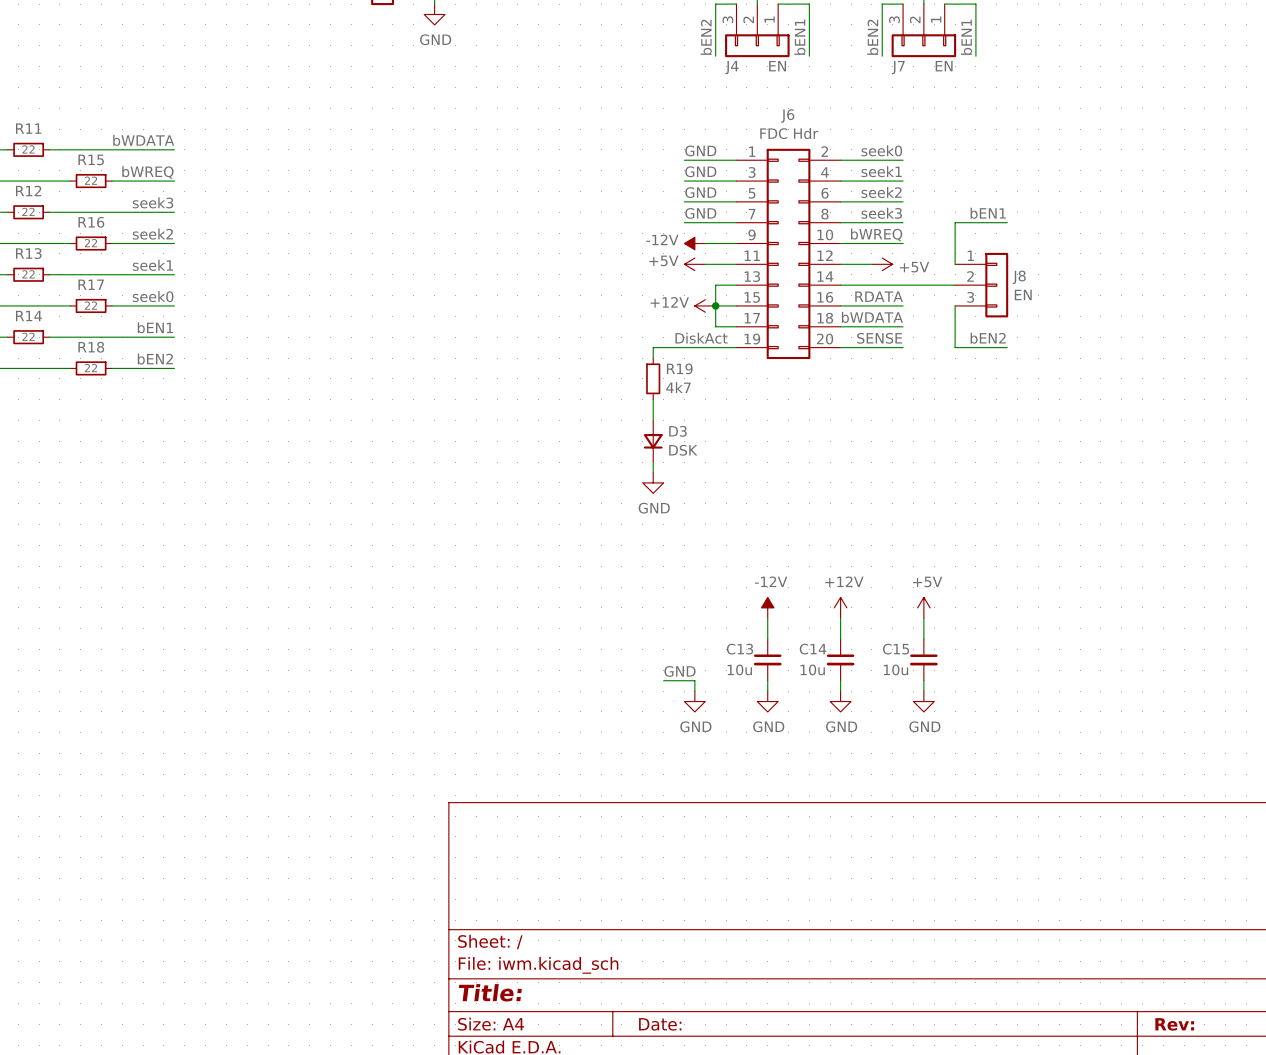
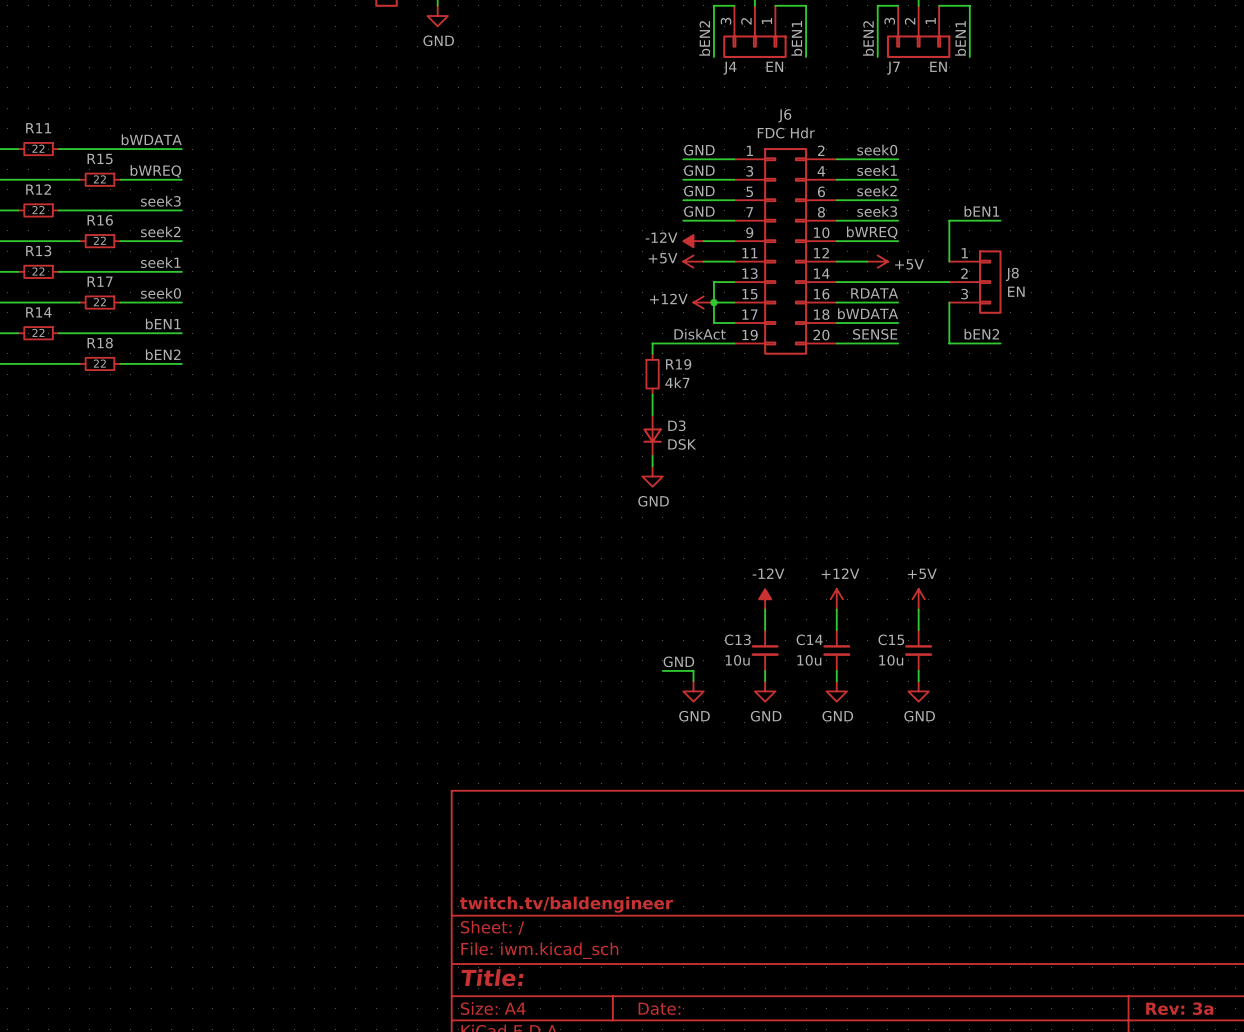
title block: none -> twitch.tv/baldengineer (566, 904)
title block: Rev: (1174, 1024) -> Rev: 3a (1179, 1008)

